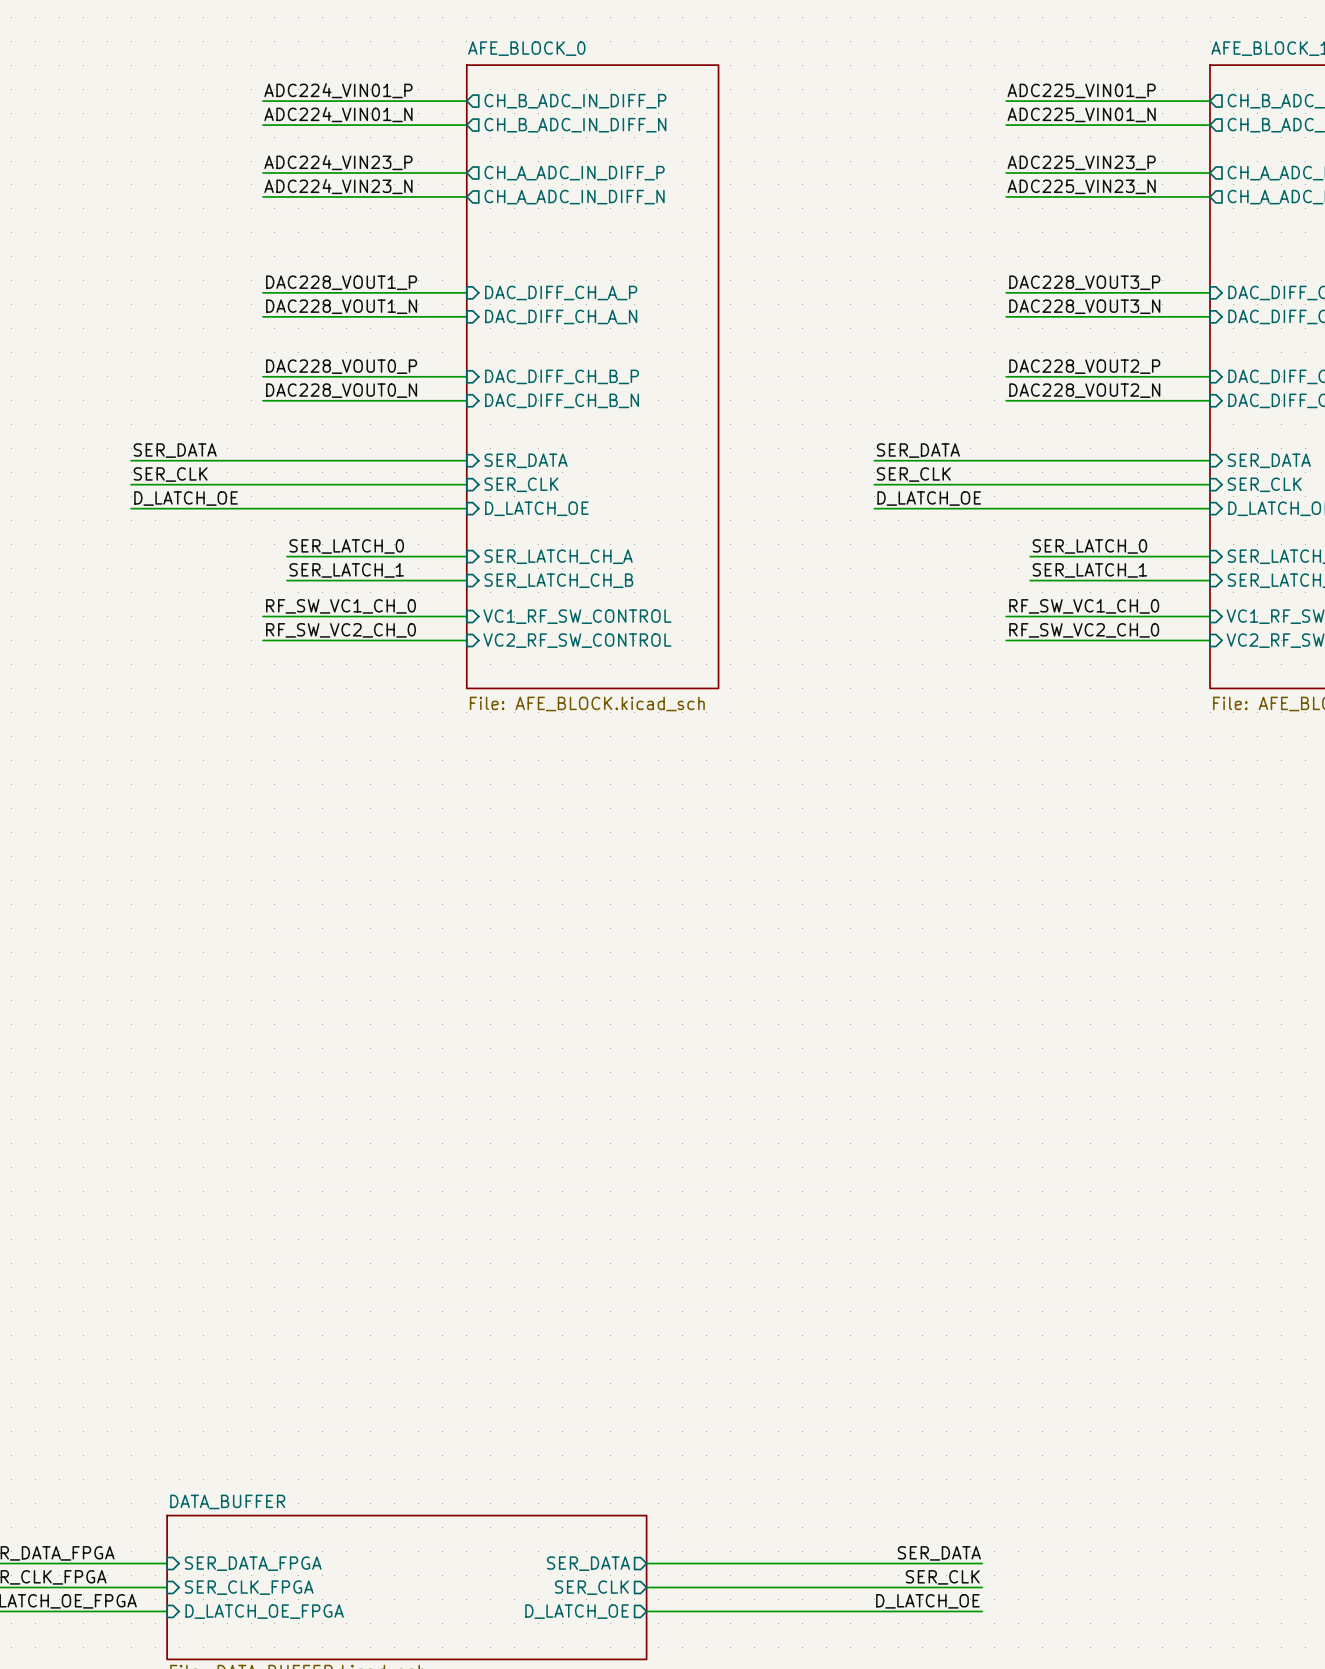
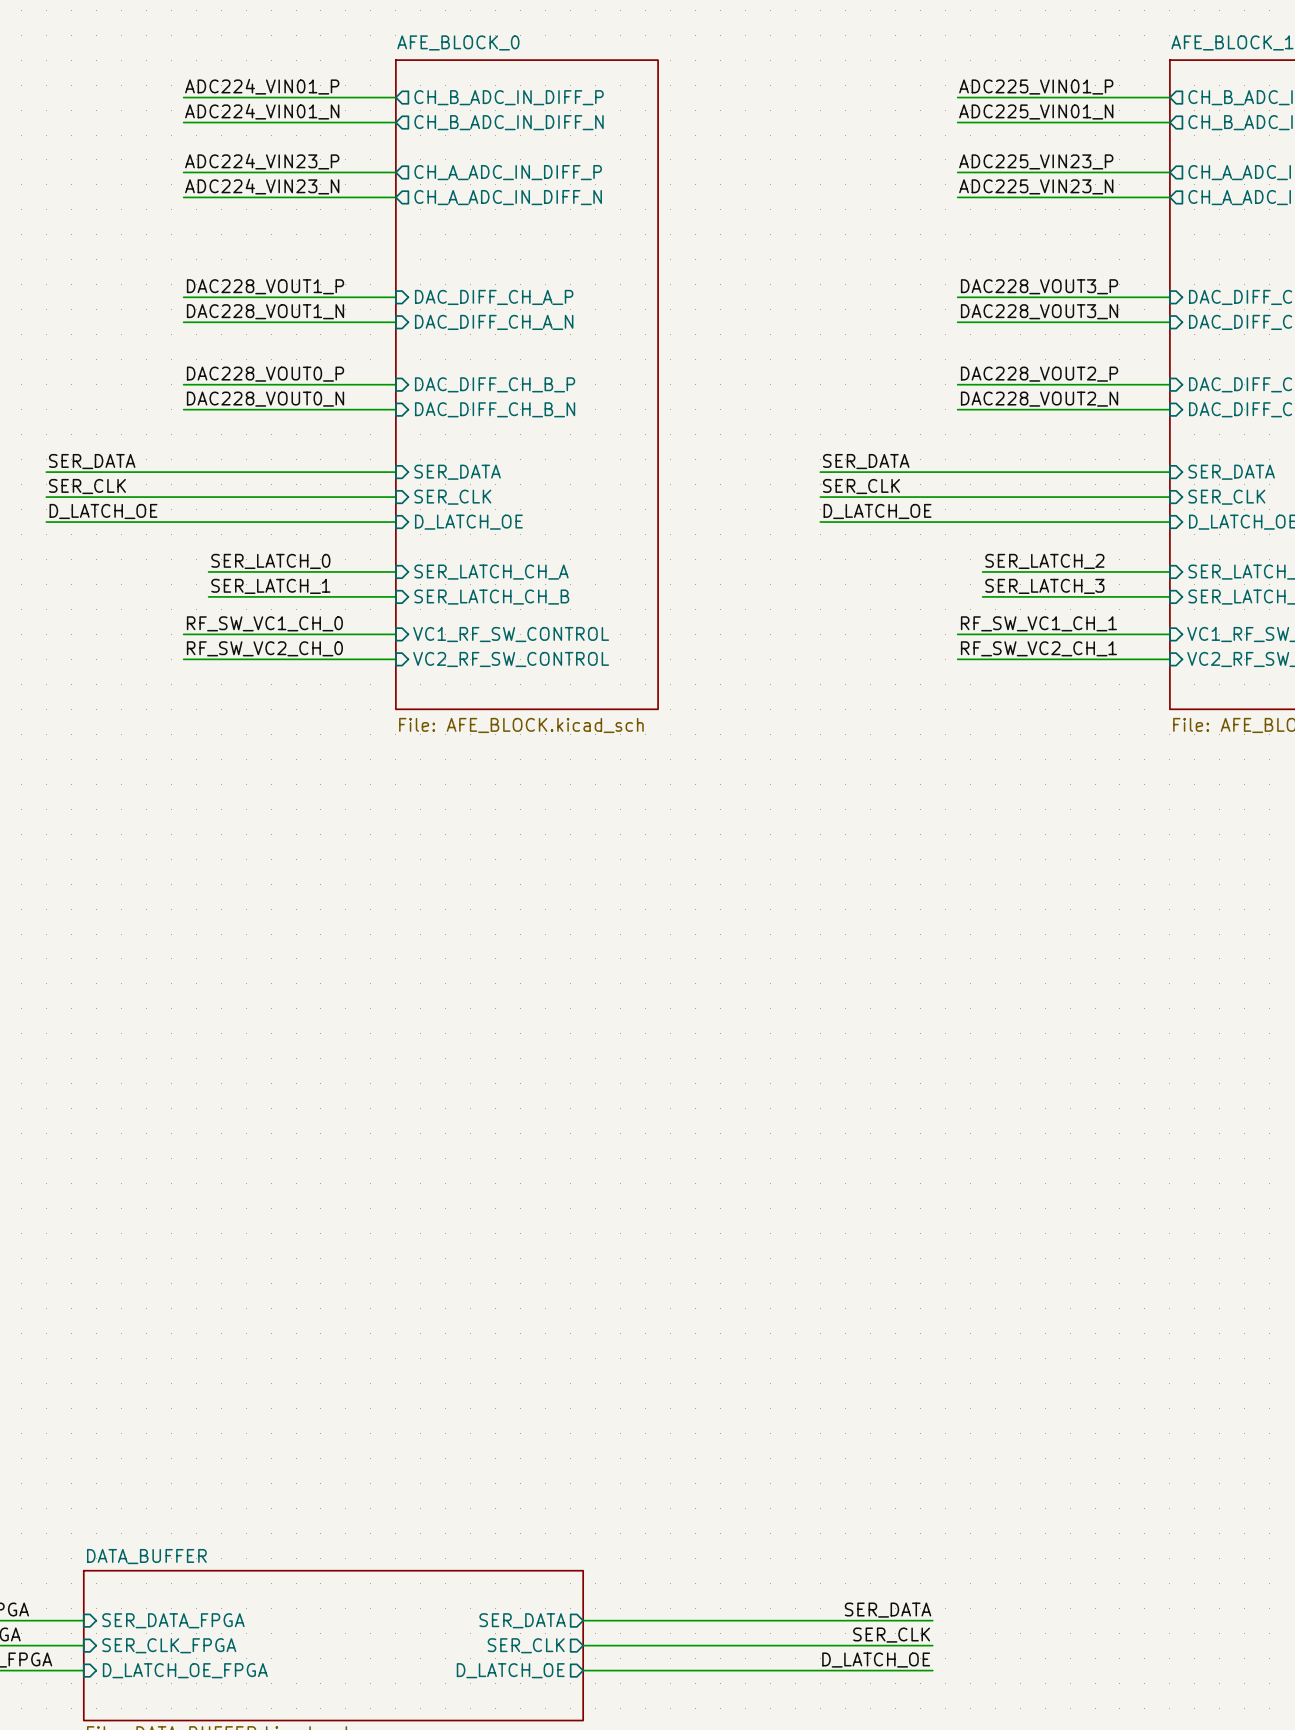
label: SER_LATCH_0 (1089, 546) -> SER_LATCH_2 (1044, 561)
label: SER_LATCH_1 (1089, 570) -> SER_LATCH_3 (1044, 586)
label: RF_SW_VC1_CH_0 (1084, 606) -> RF_SW_VC1_CH_1 (1038, 623)
label: RF_SW_VC2_CH_0 (1084, 630) -> RF_SW_VC2_CH_1 (1038, 648)

